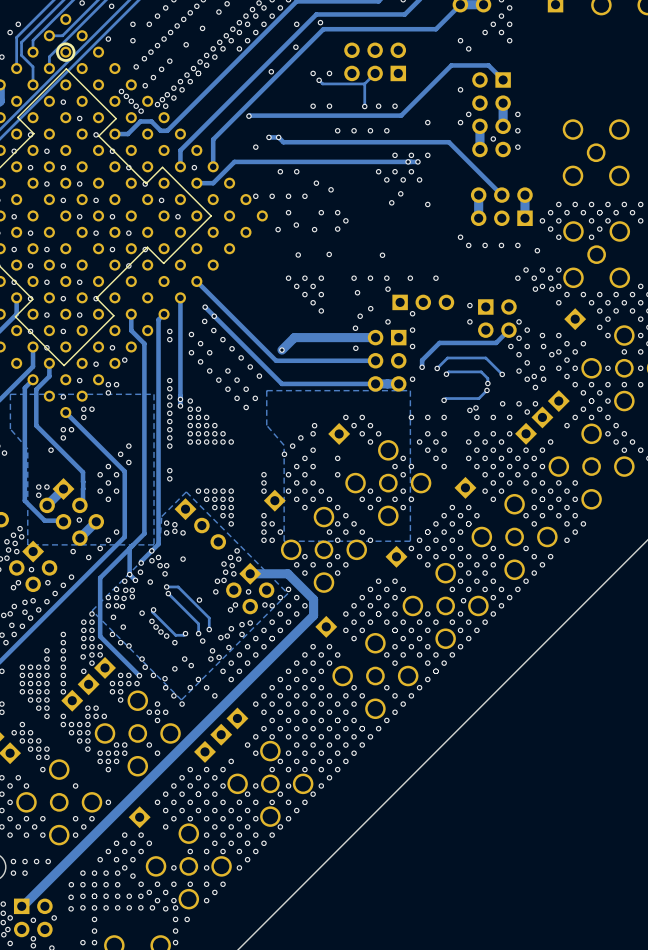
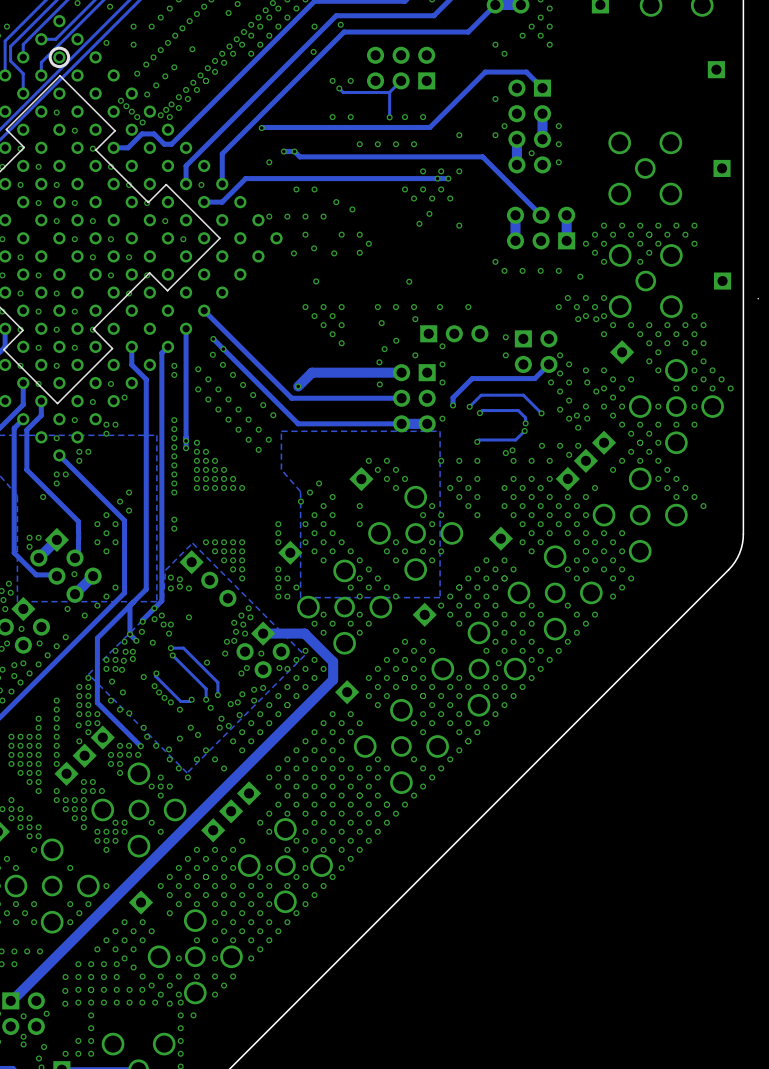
via: (202, 28) -> none
via: (271, 71) -> none
via: (329, 254) -> none
via: none -> (228, 399)
via: (314, 425) -> none
via: (313, 433) -> none

